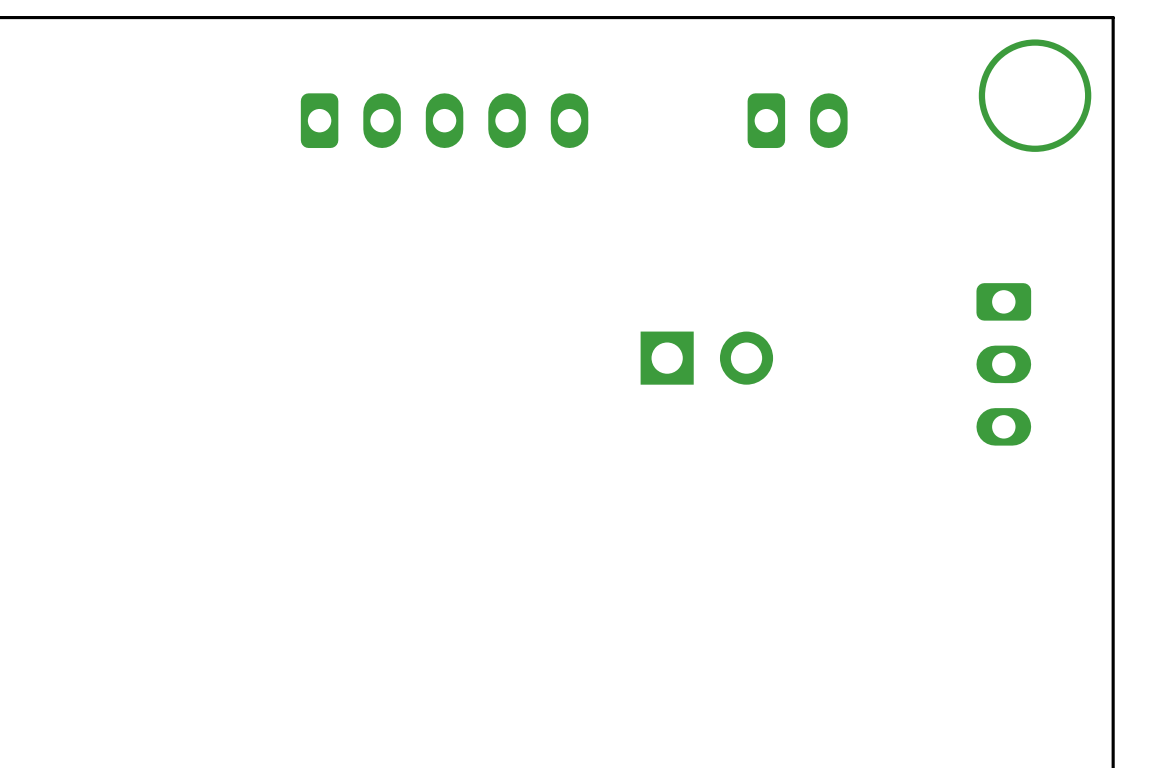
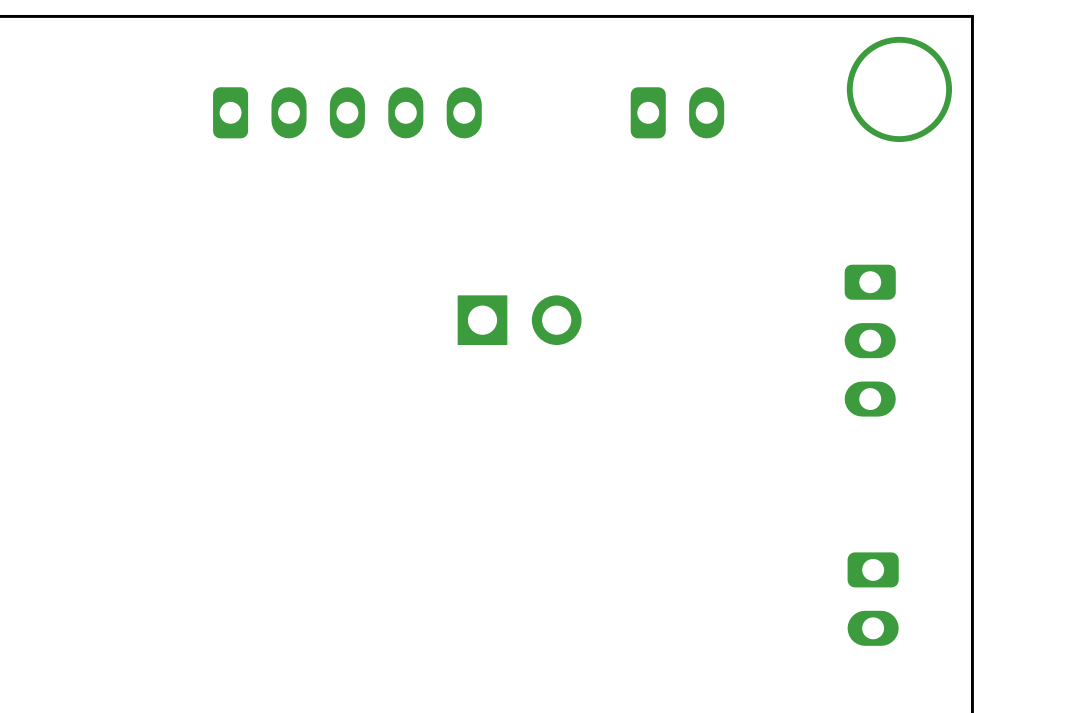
part position: (706, 358) -> (519, 320)
part: none -> (873, 599)

